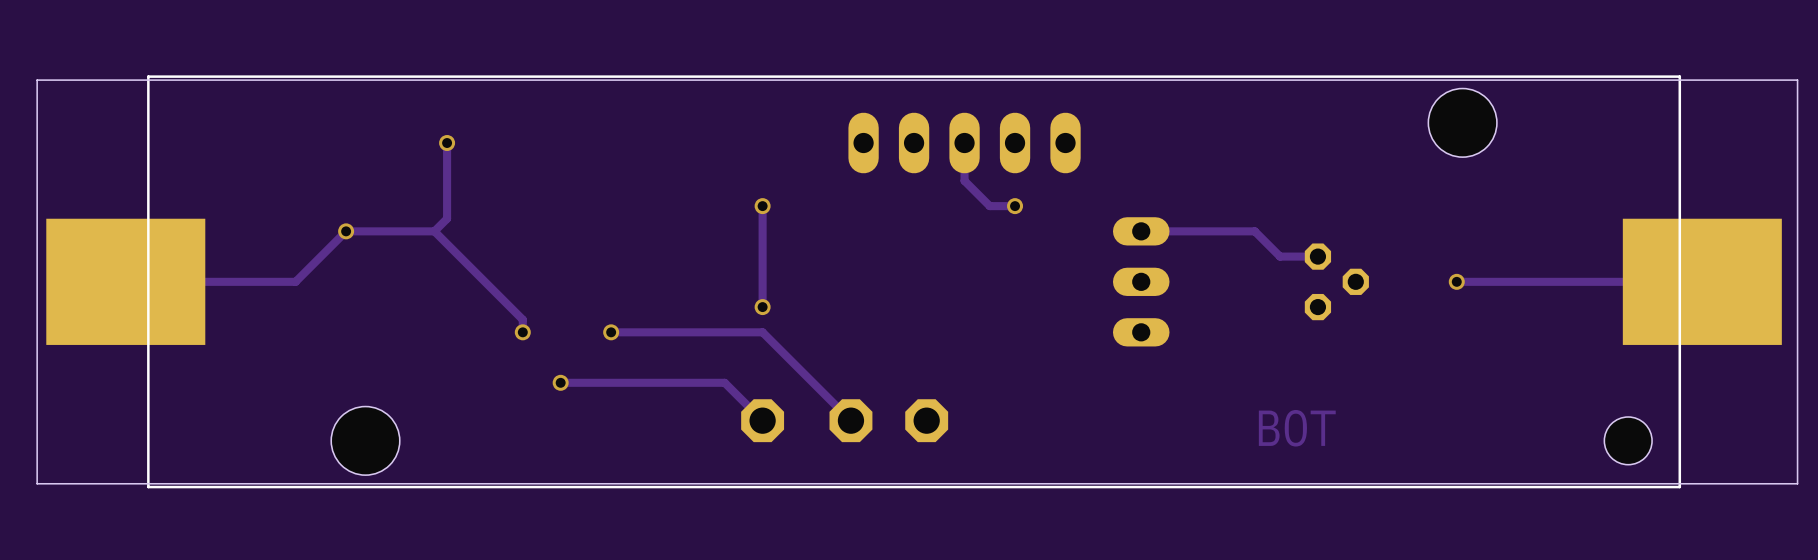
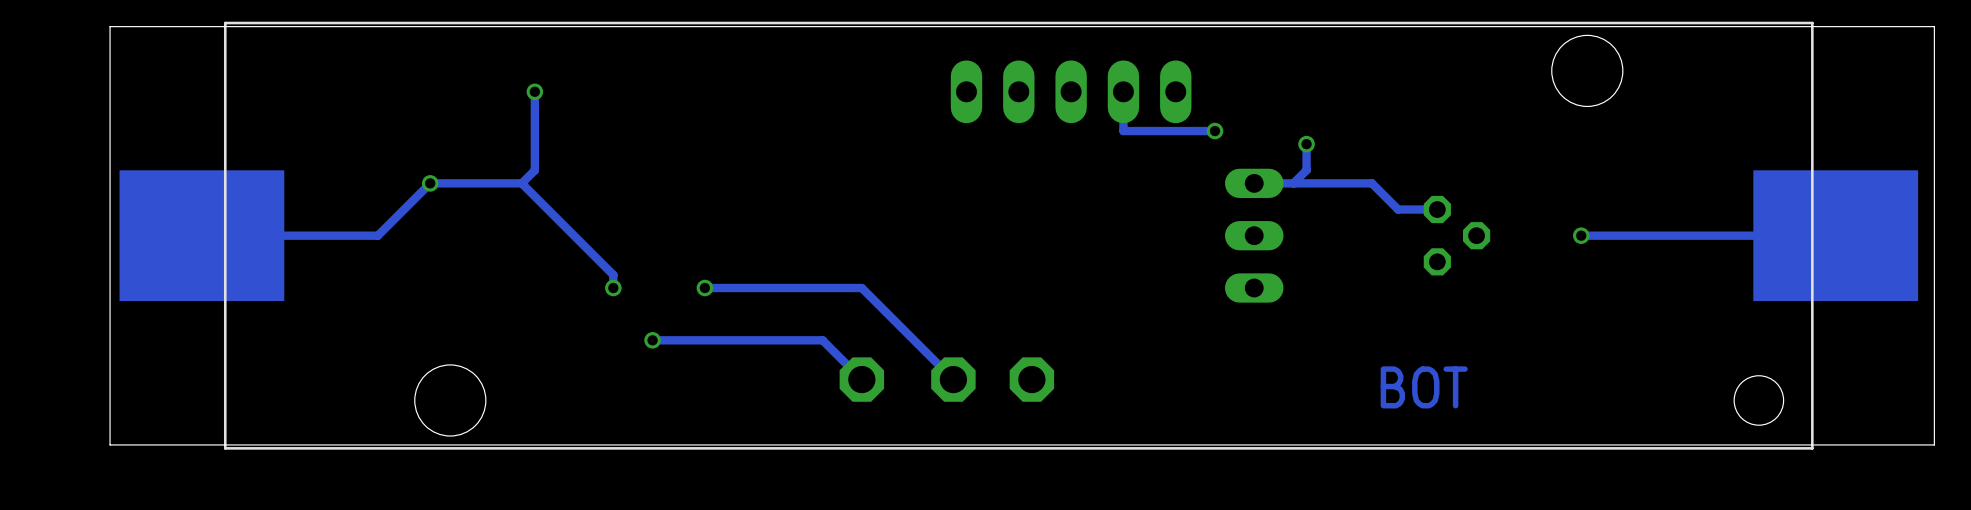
track: (964, 143) (964, 180) (989, 206) (1015, 206) -> none
track: none -> (1123, 91) (1123, 131) (1215, 131)
via: none -> (1215, 131)
track: none -> (1306, 144) (1306, 170) (1293, 183)
via: none -> (1306, 144)
track: (762, 206) (762, 307) -> none
via: (762, 206) -> none
via: (1015, 206) -> none
via: (762, 307) -> none

